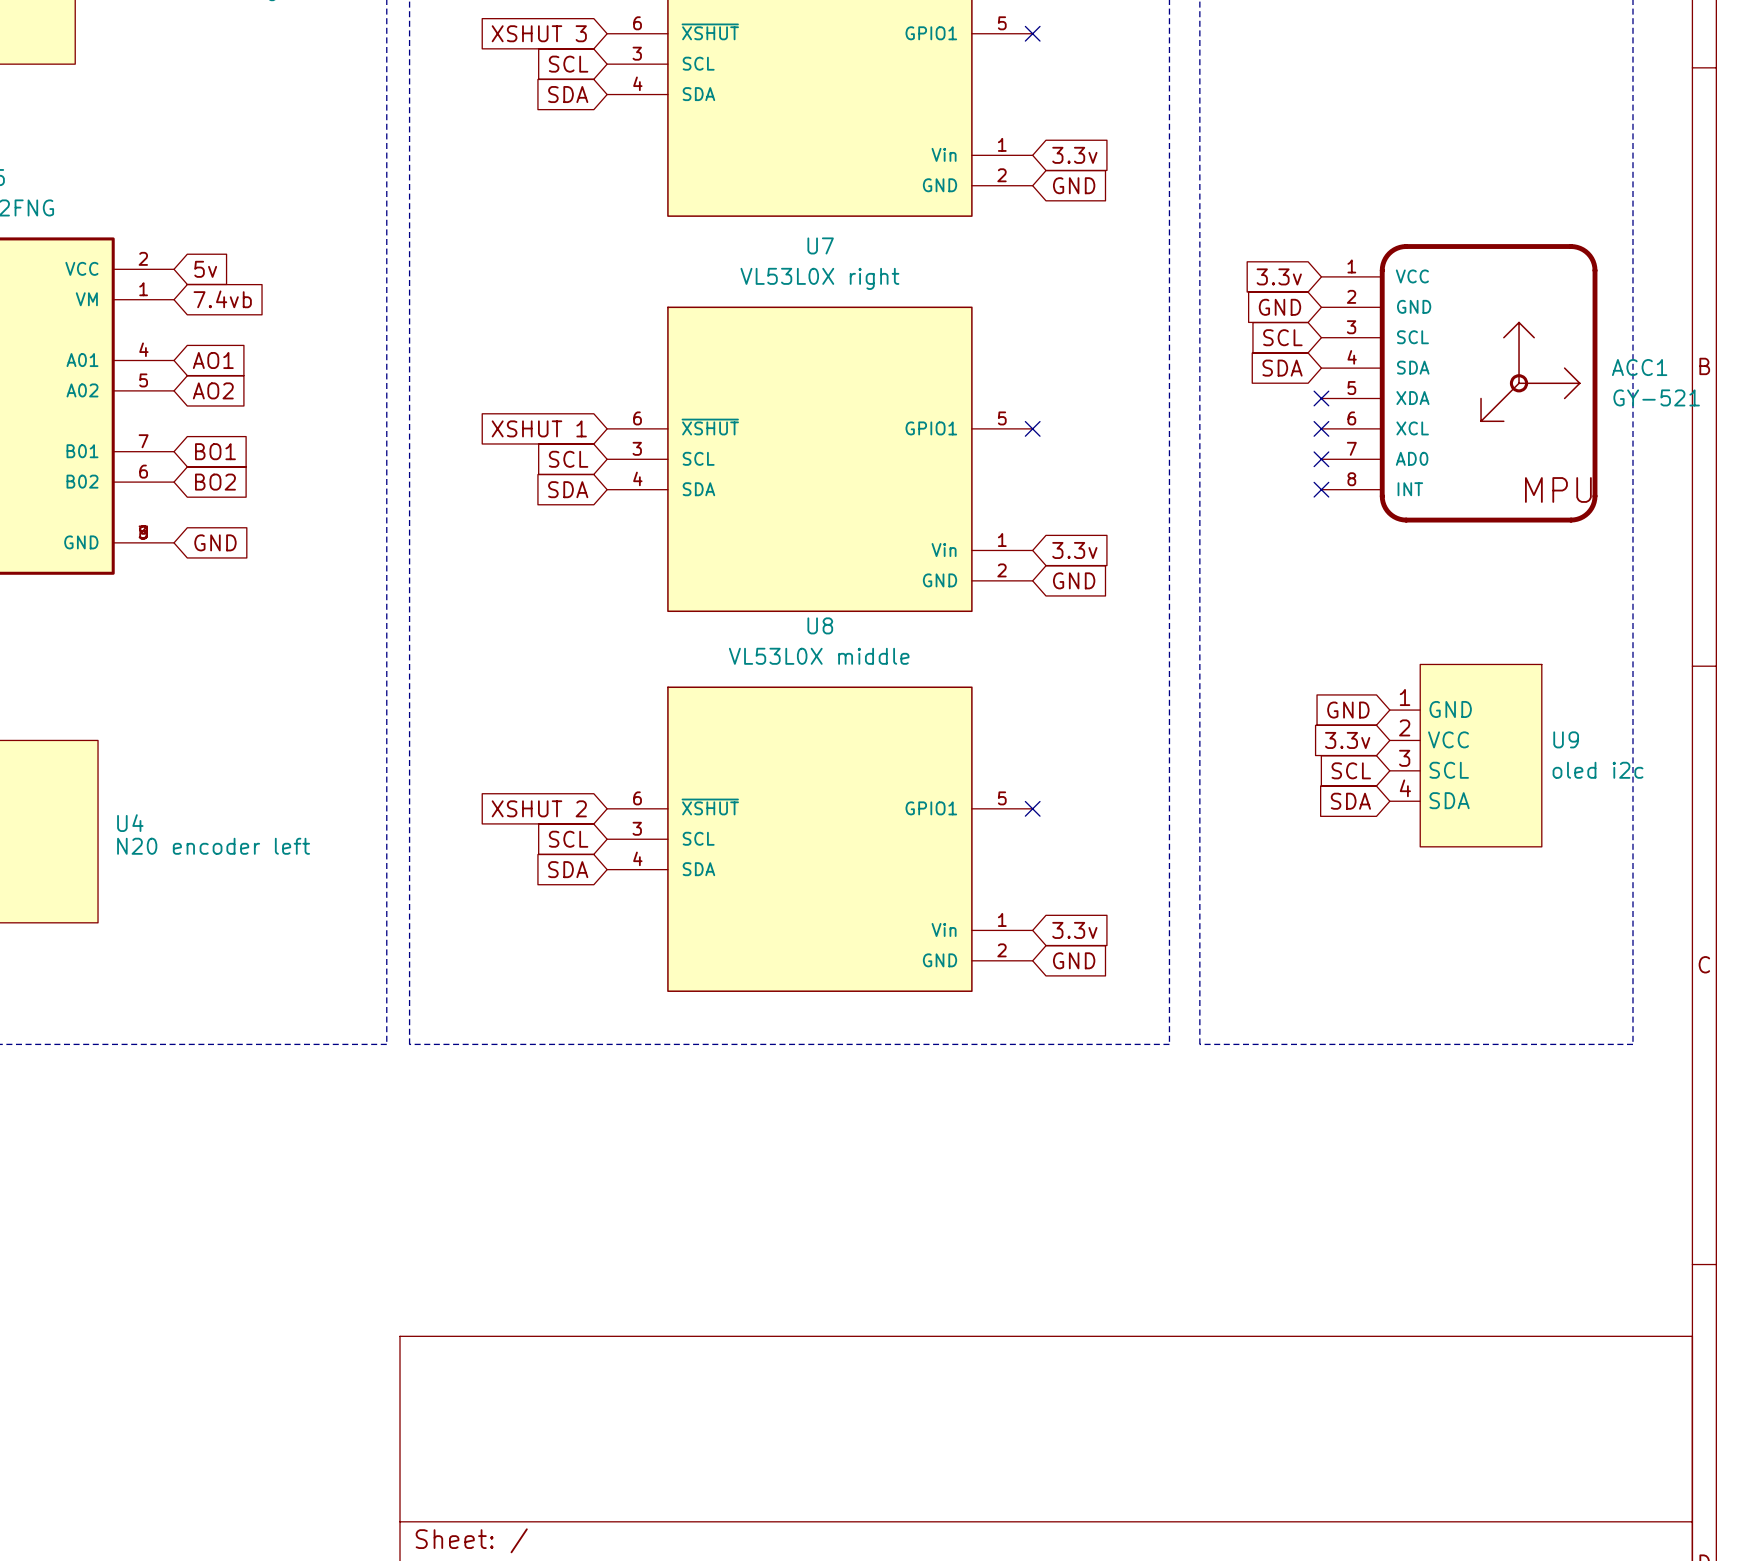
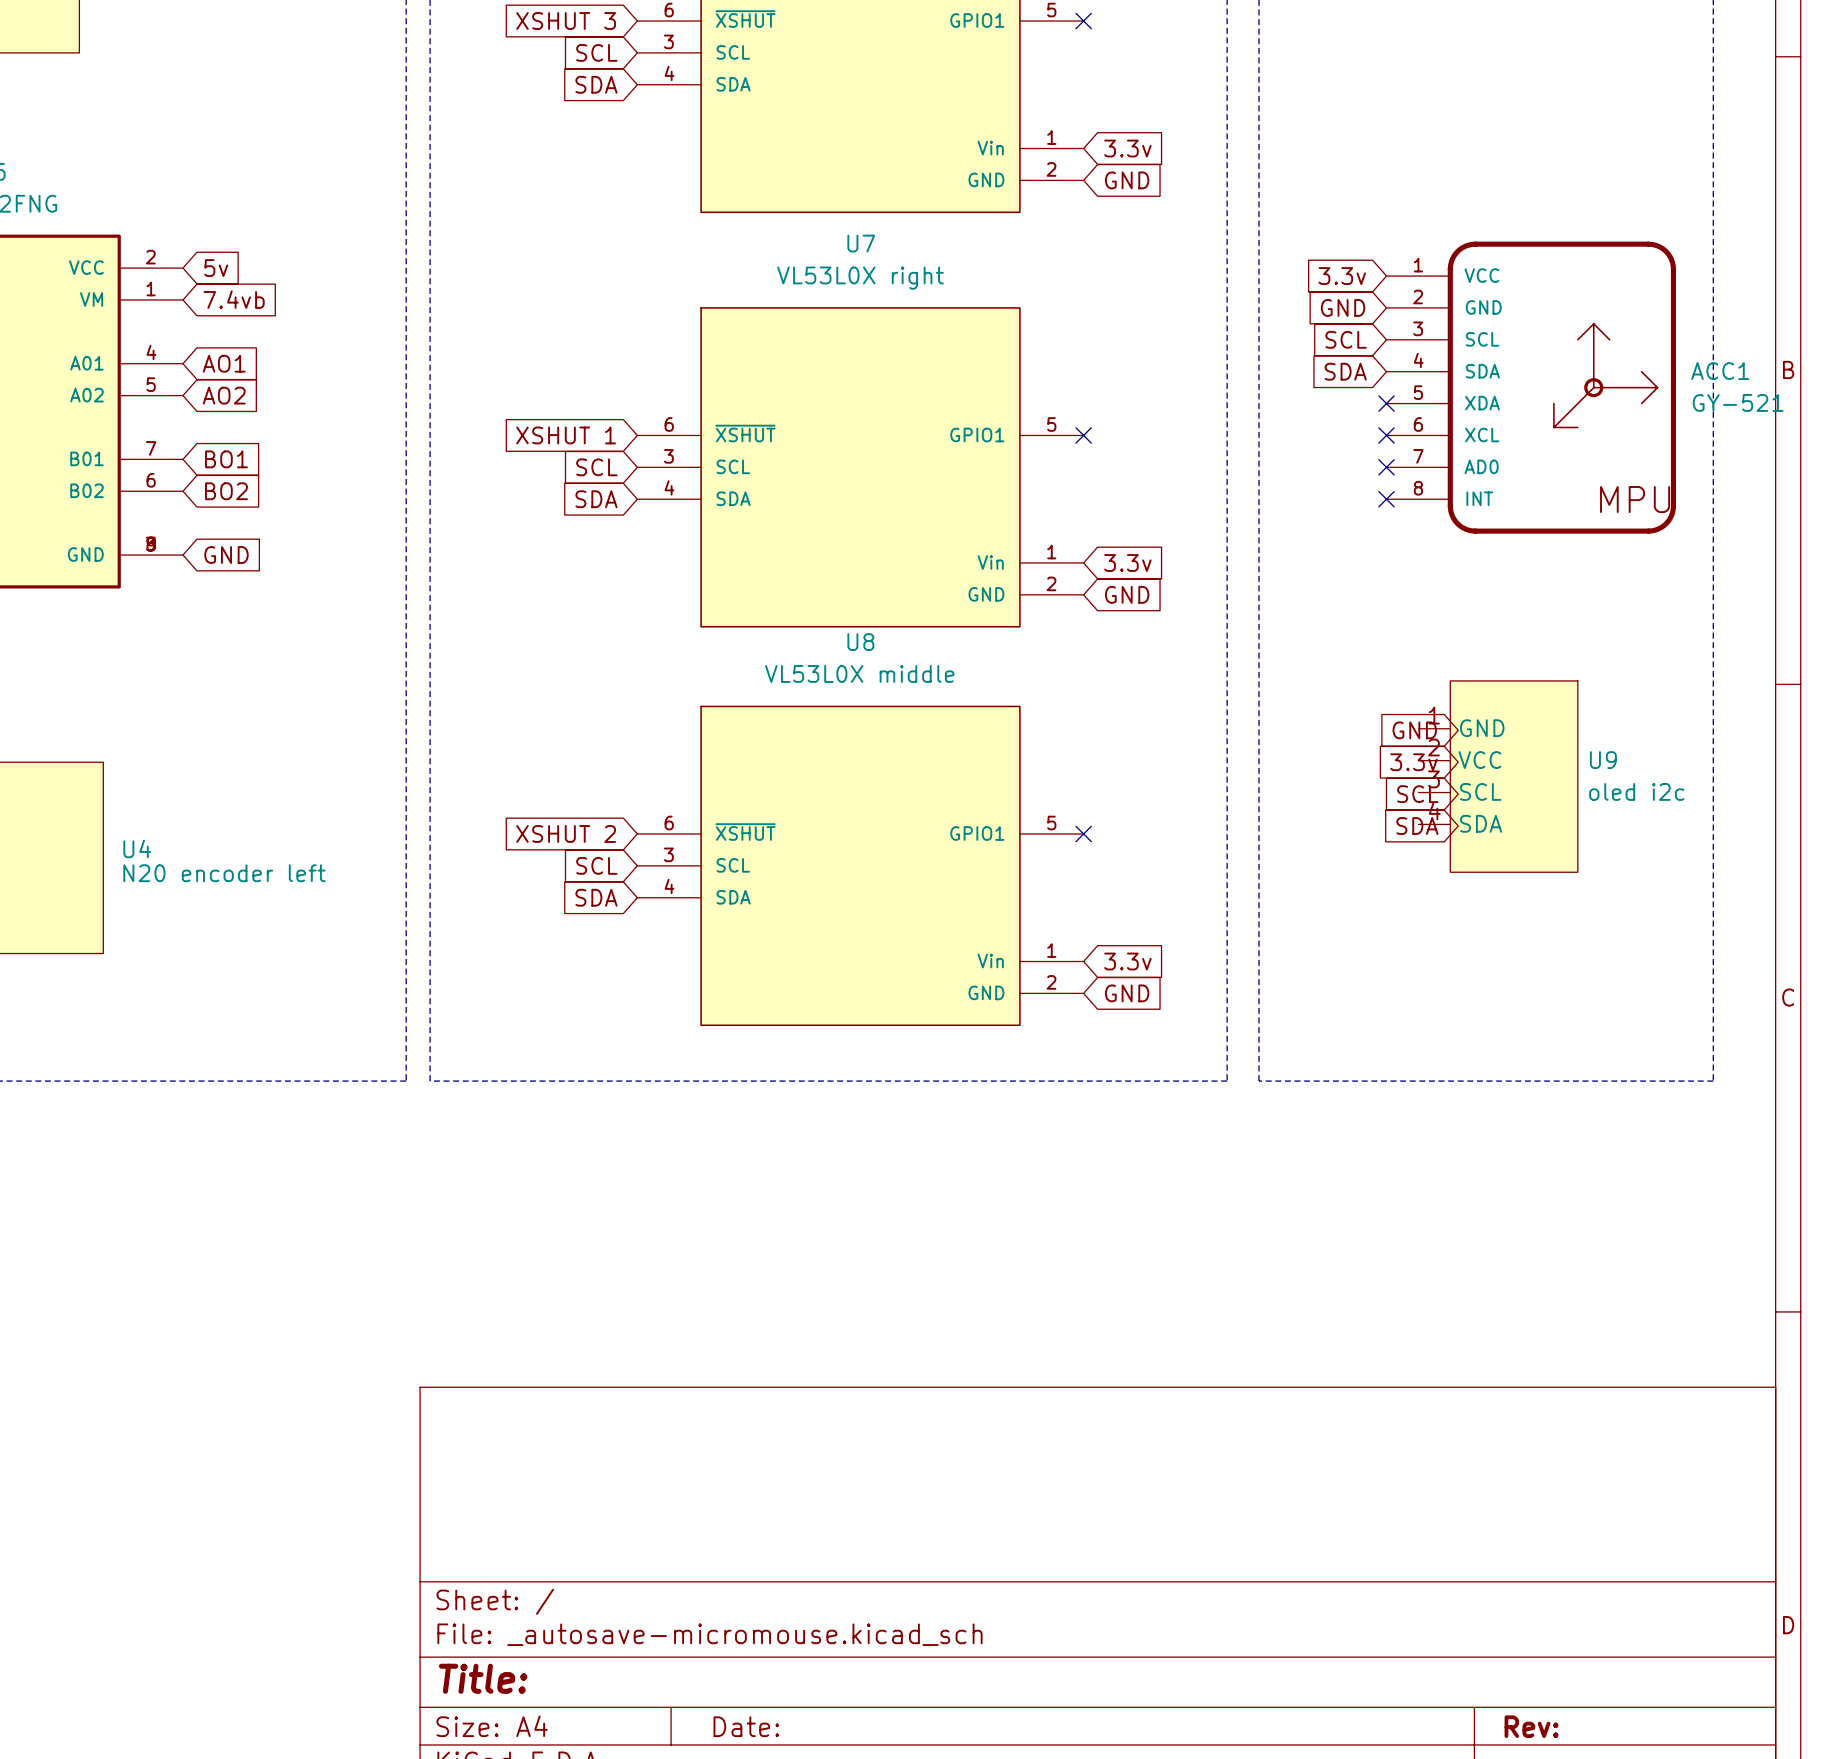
U9 position: (1465, 755) -> (1498, 776)

